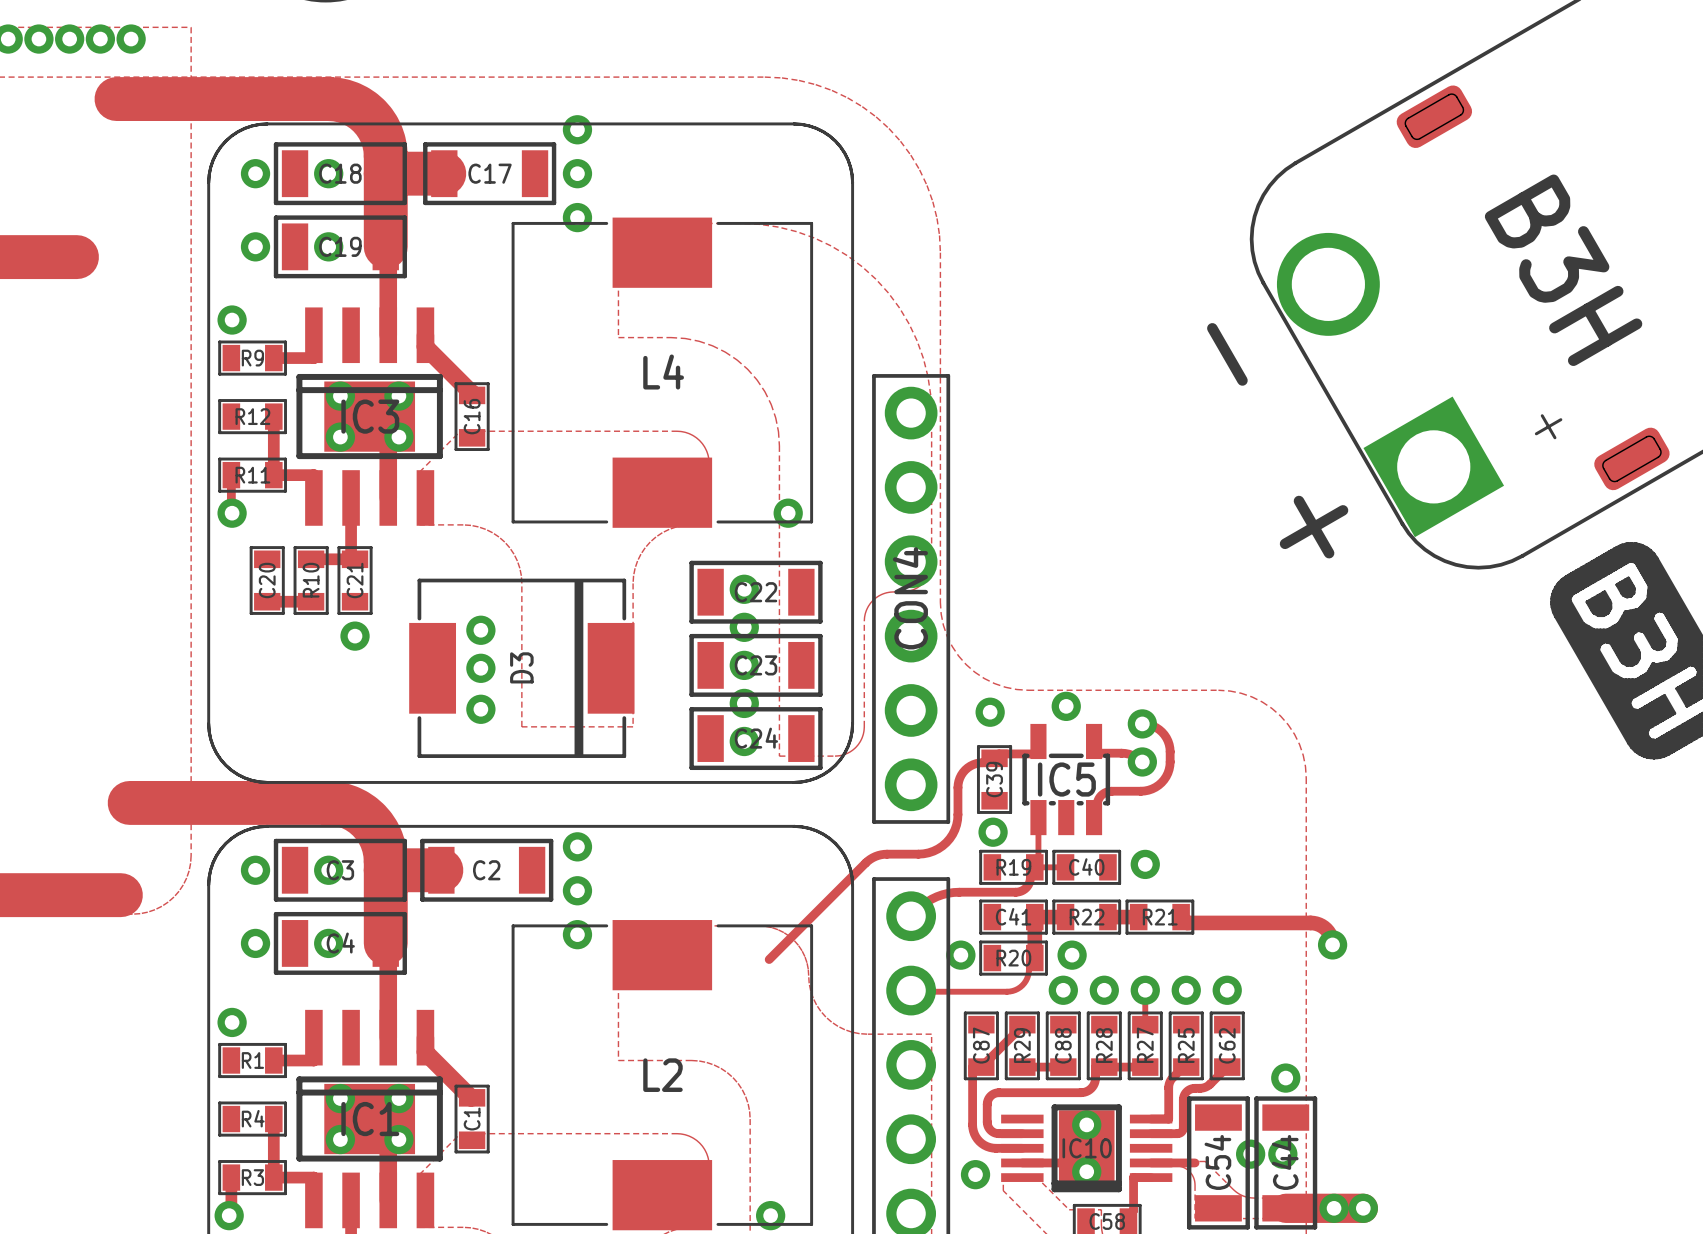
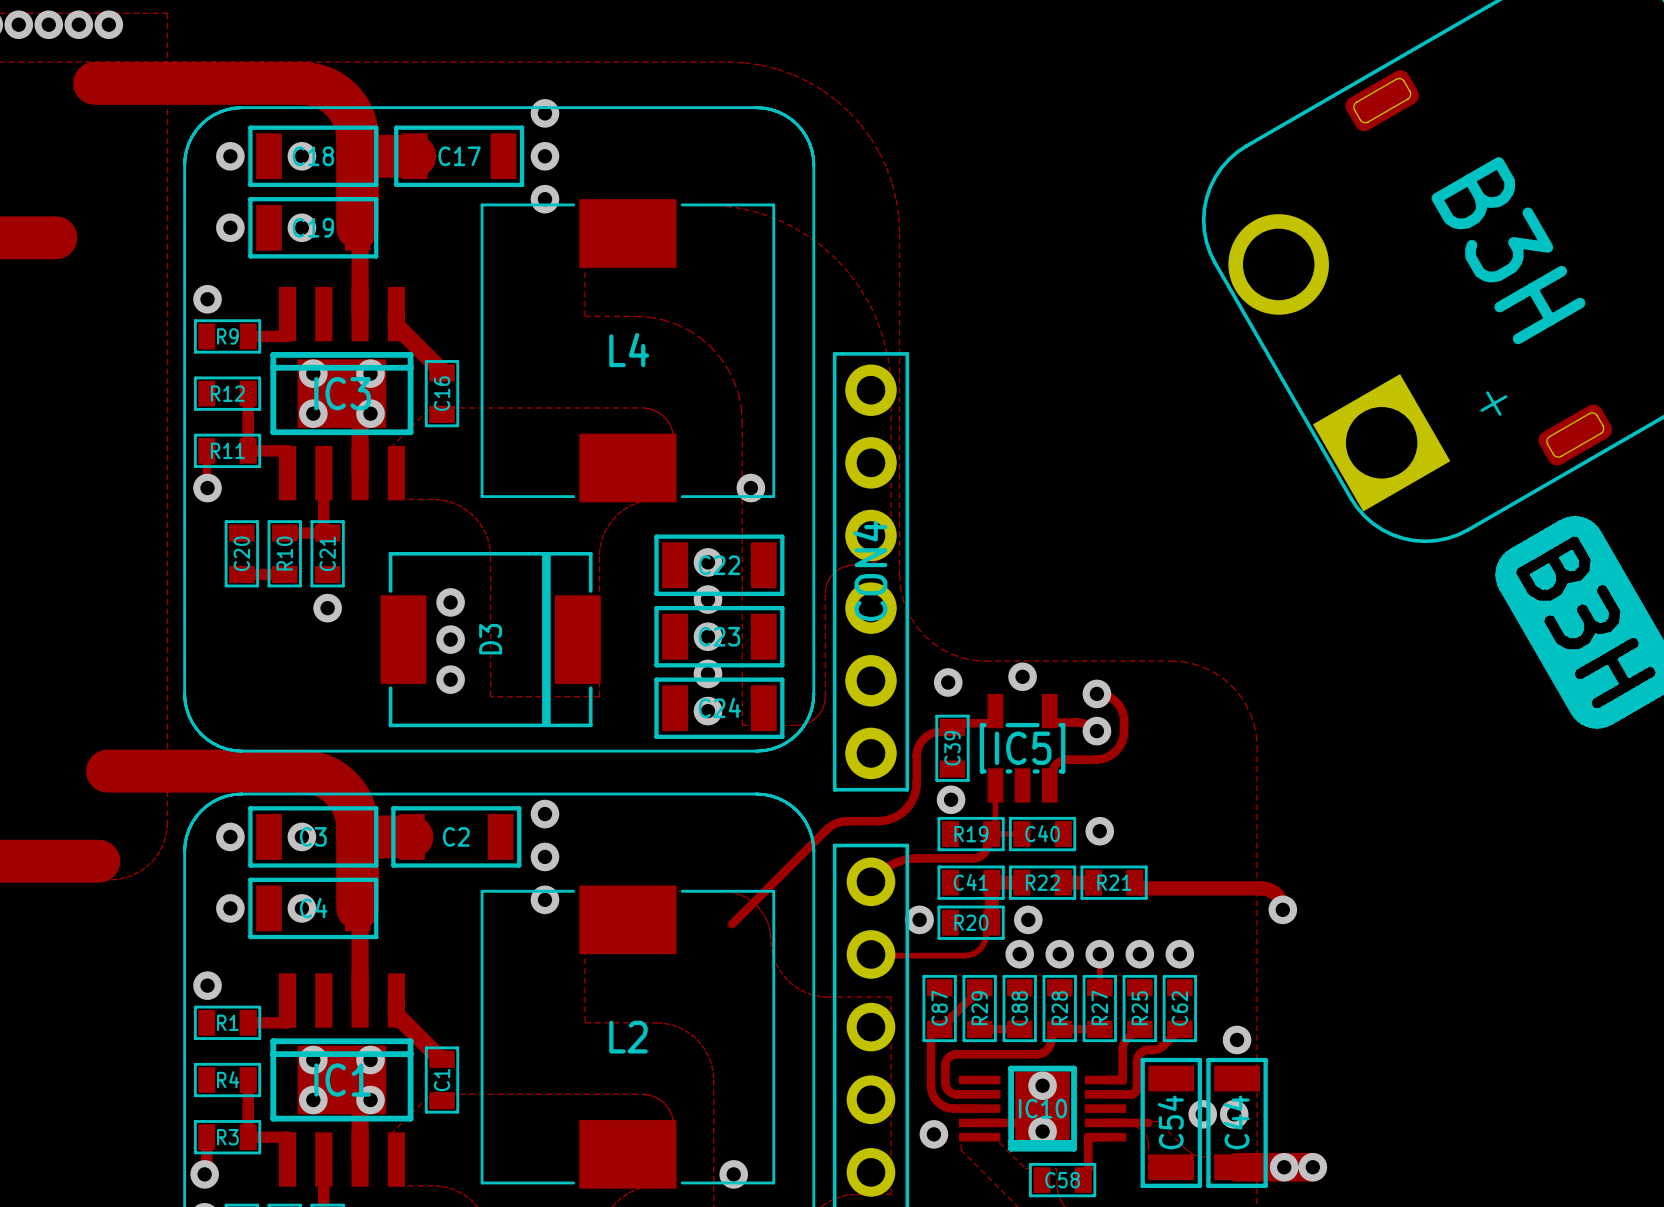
text: - (1227, 354) -> none
text: + (1314, 527) -> none

